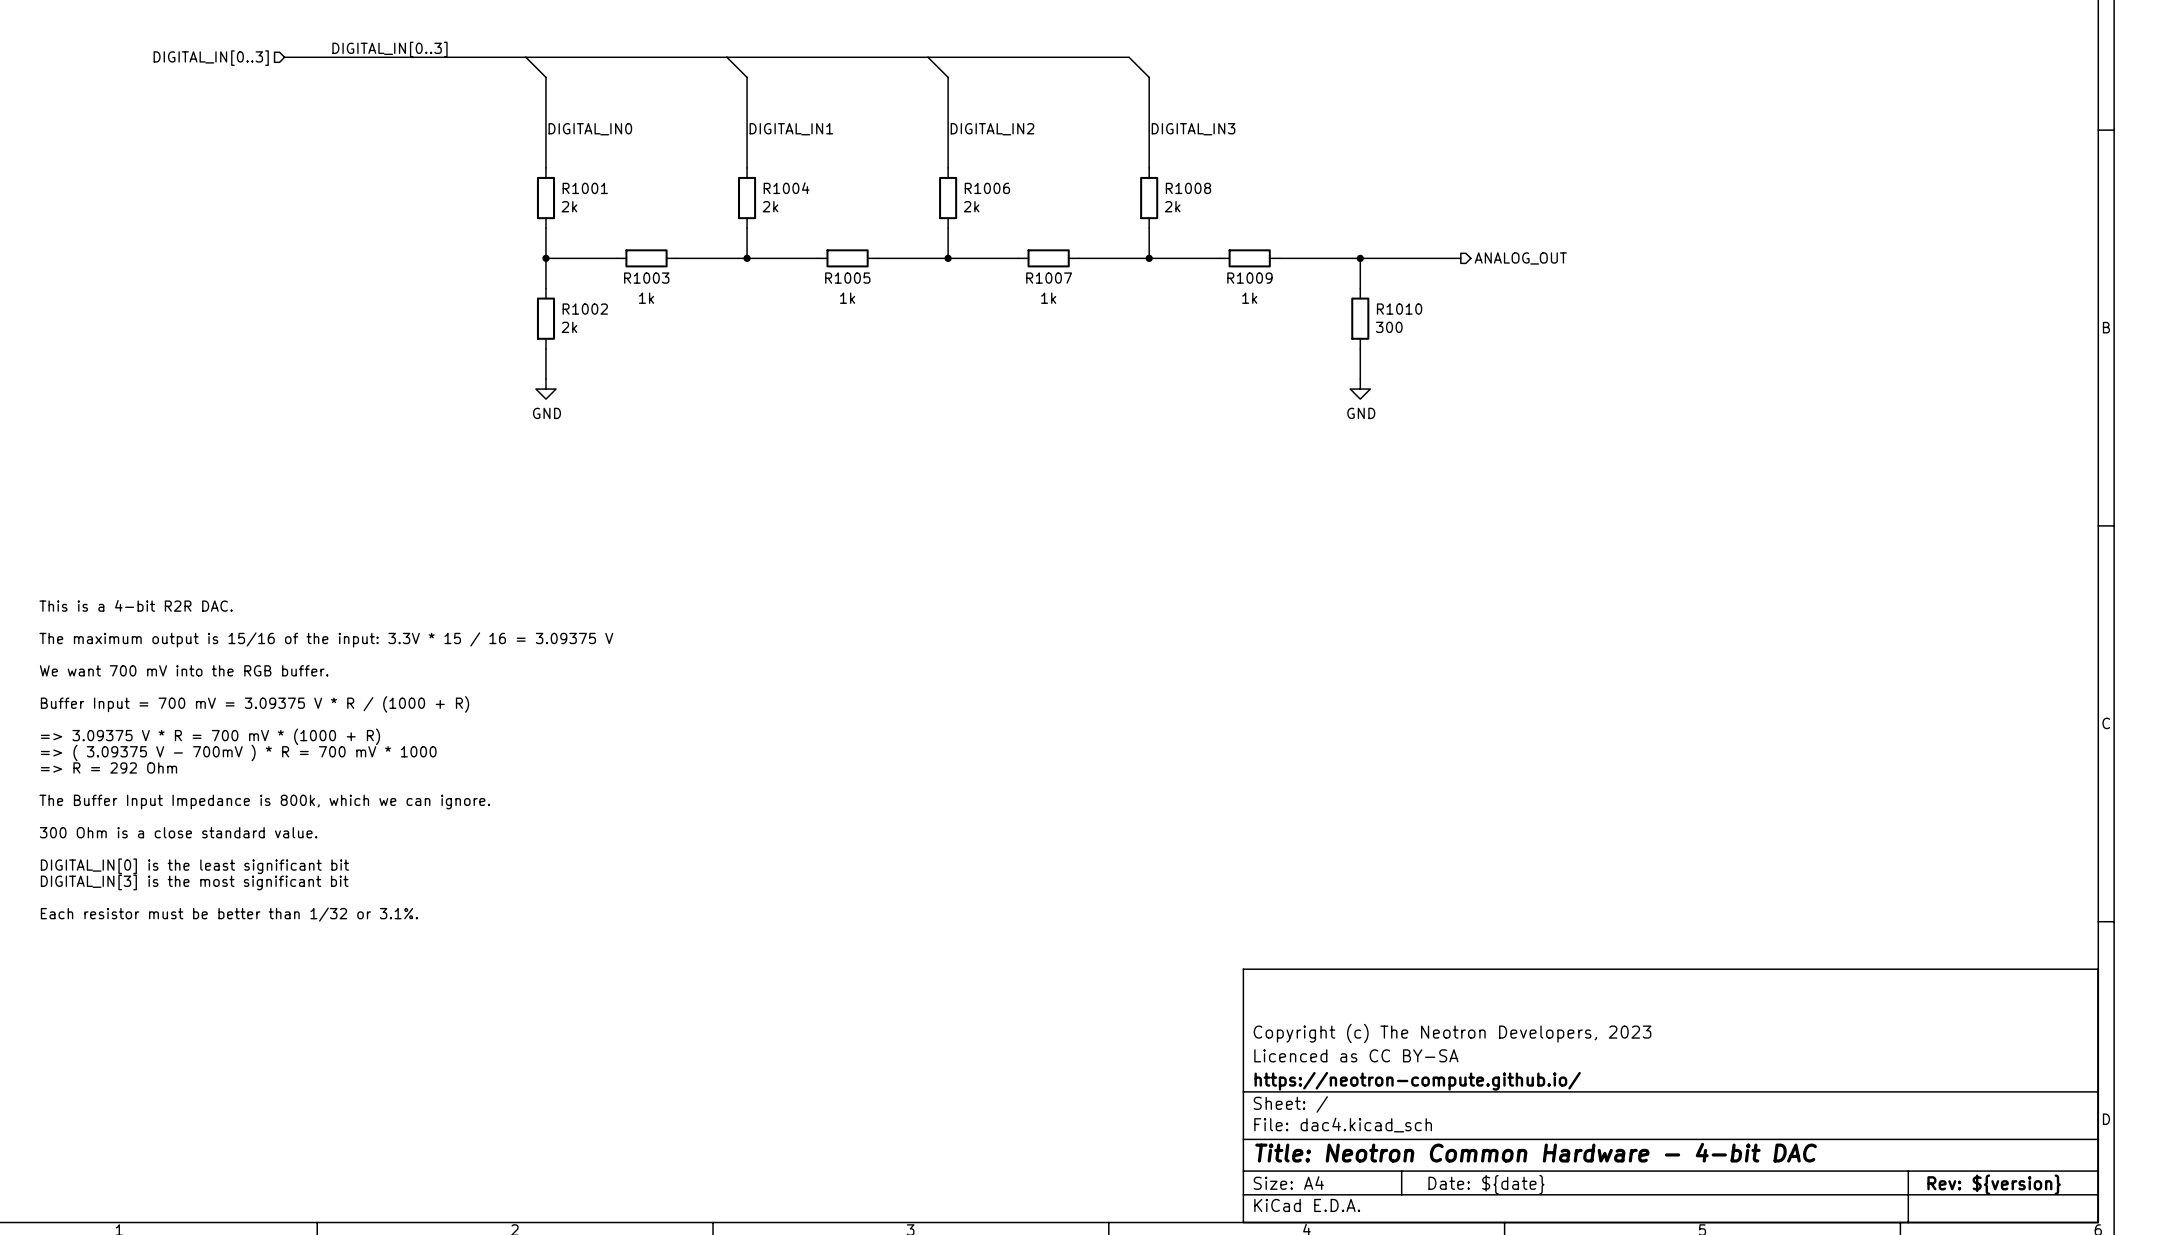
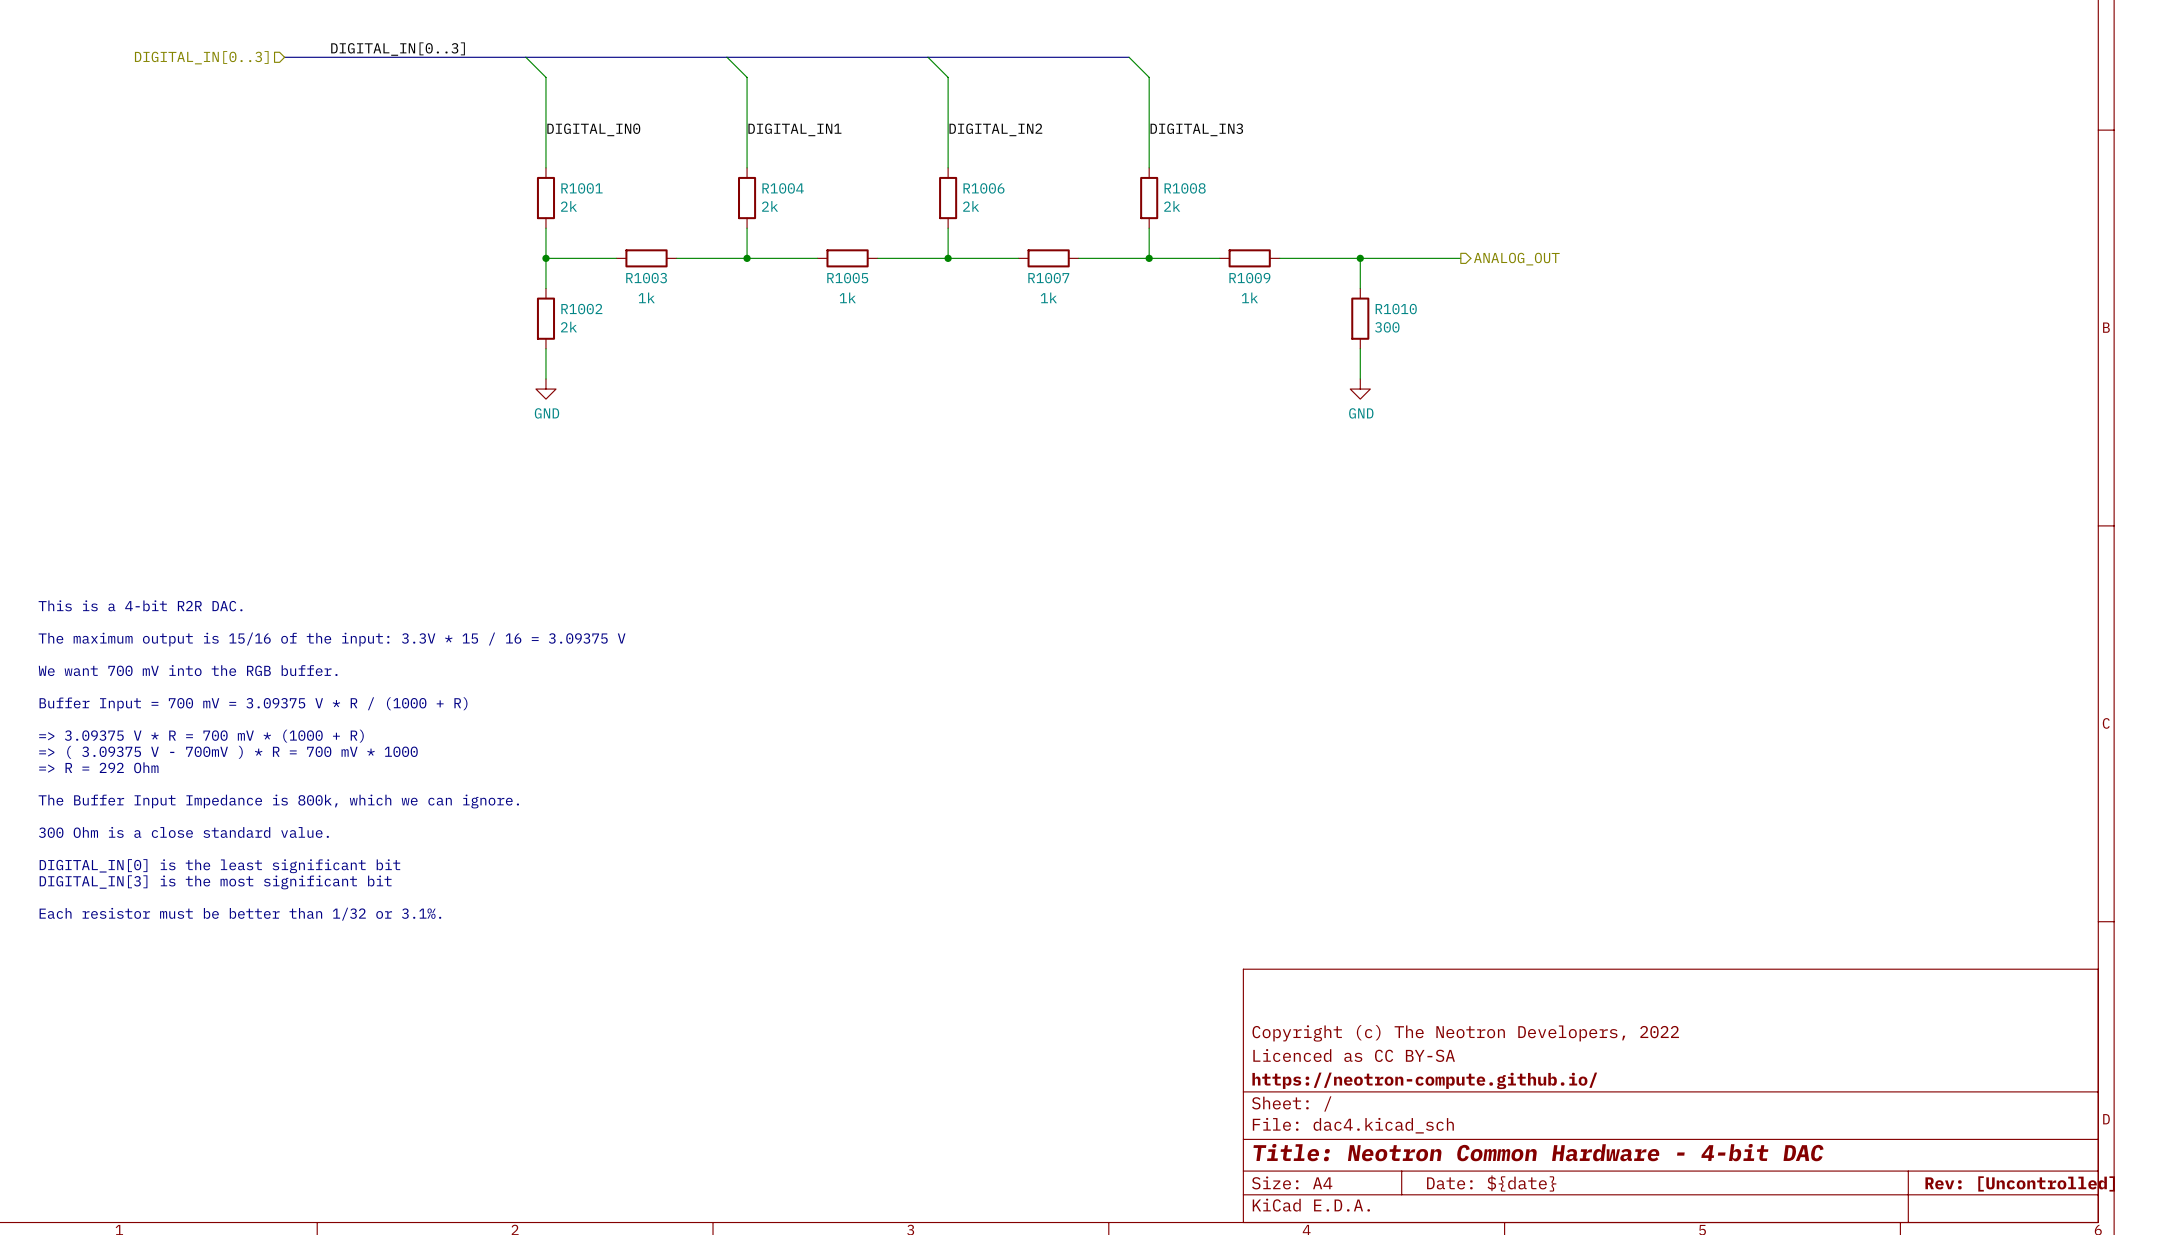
title block: Copyright (c) The Neotron Developers, 2023 (1452, 1033) -> Copyright (c) The Neotron Developers, 2022 (1465, 1033)
title block: Rev: ${version} (1994, 1184) -> Rev: [Uncontrolled] (2020, 1183)

